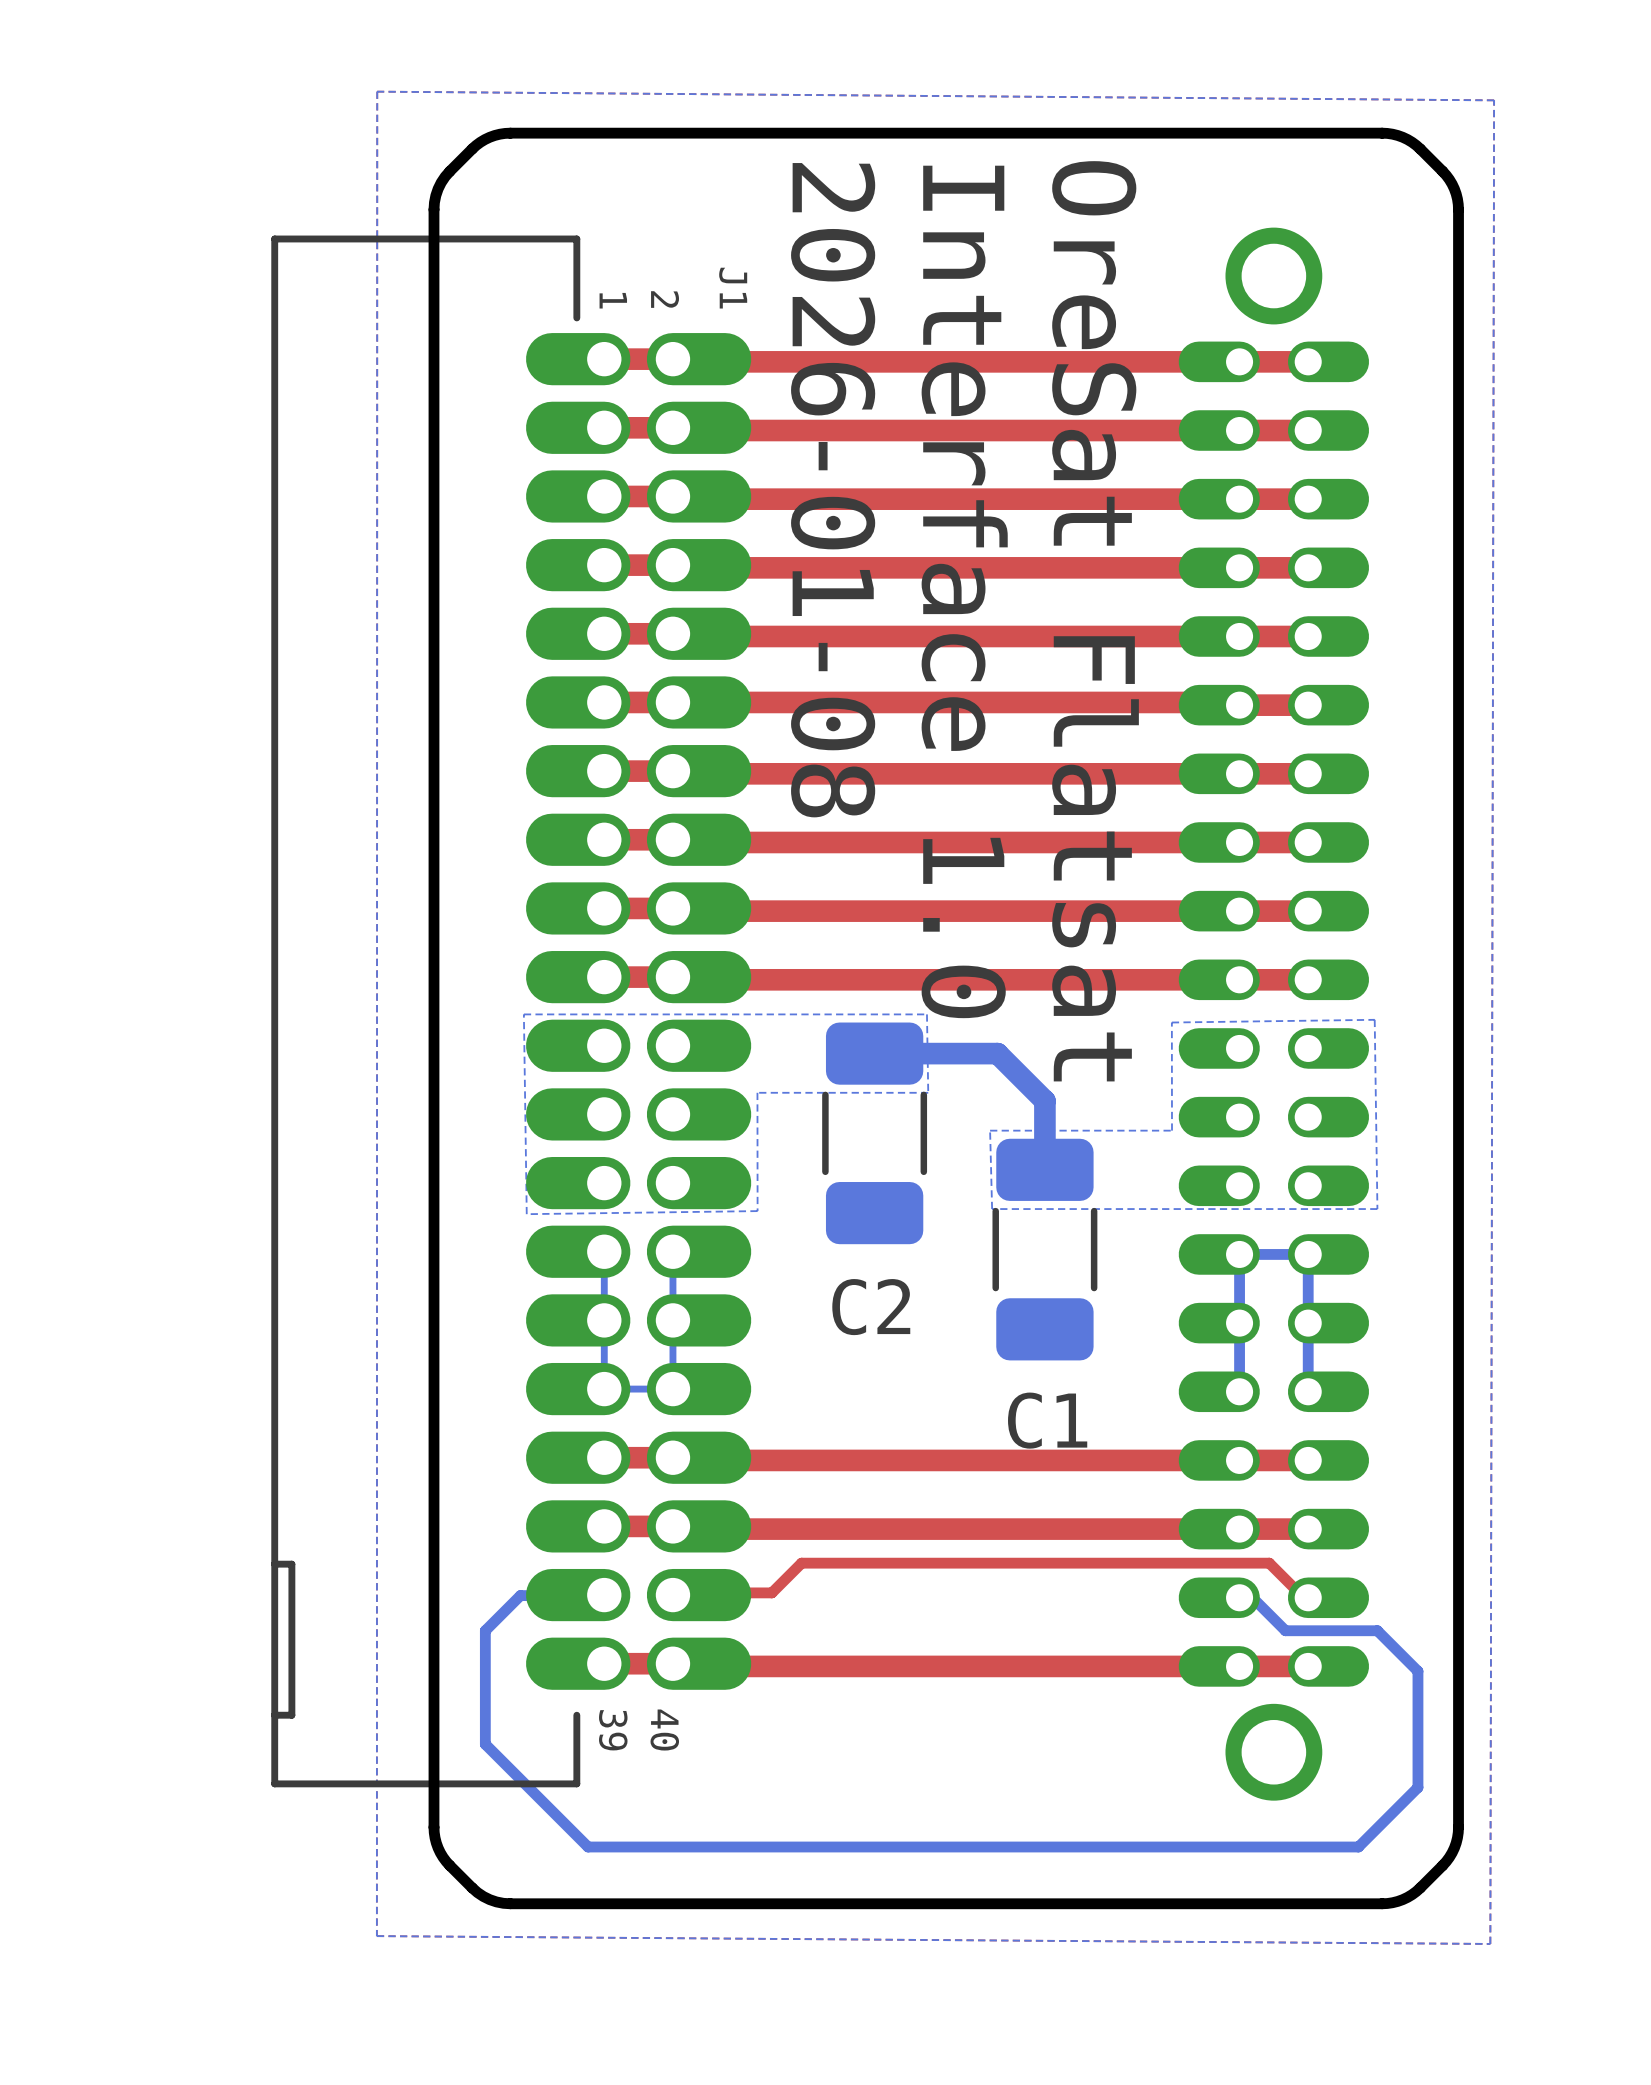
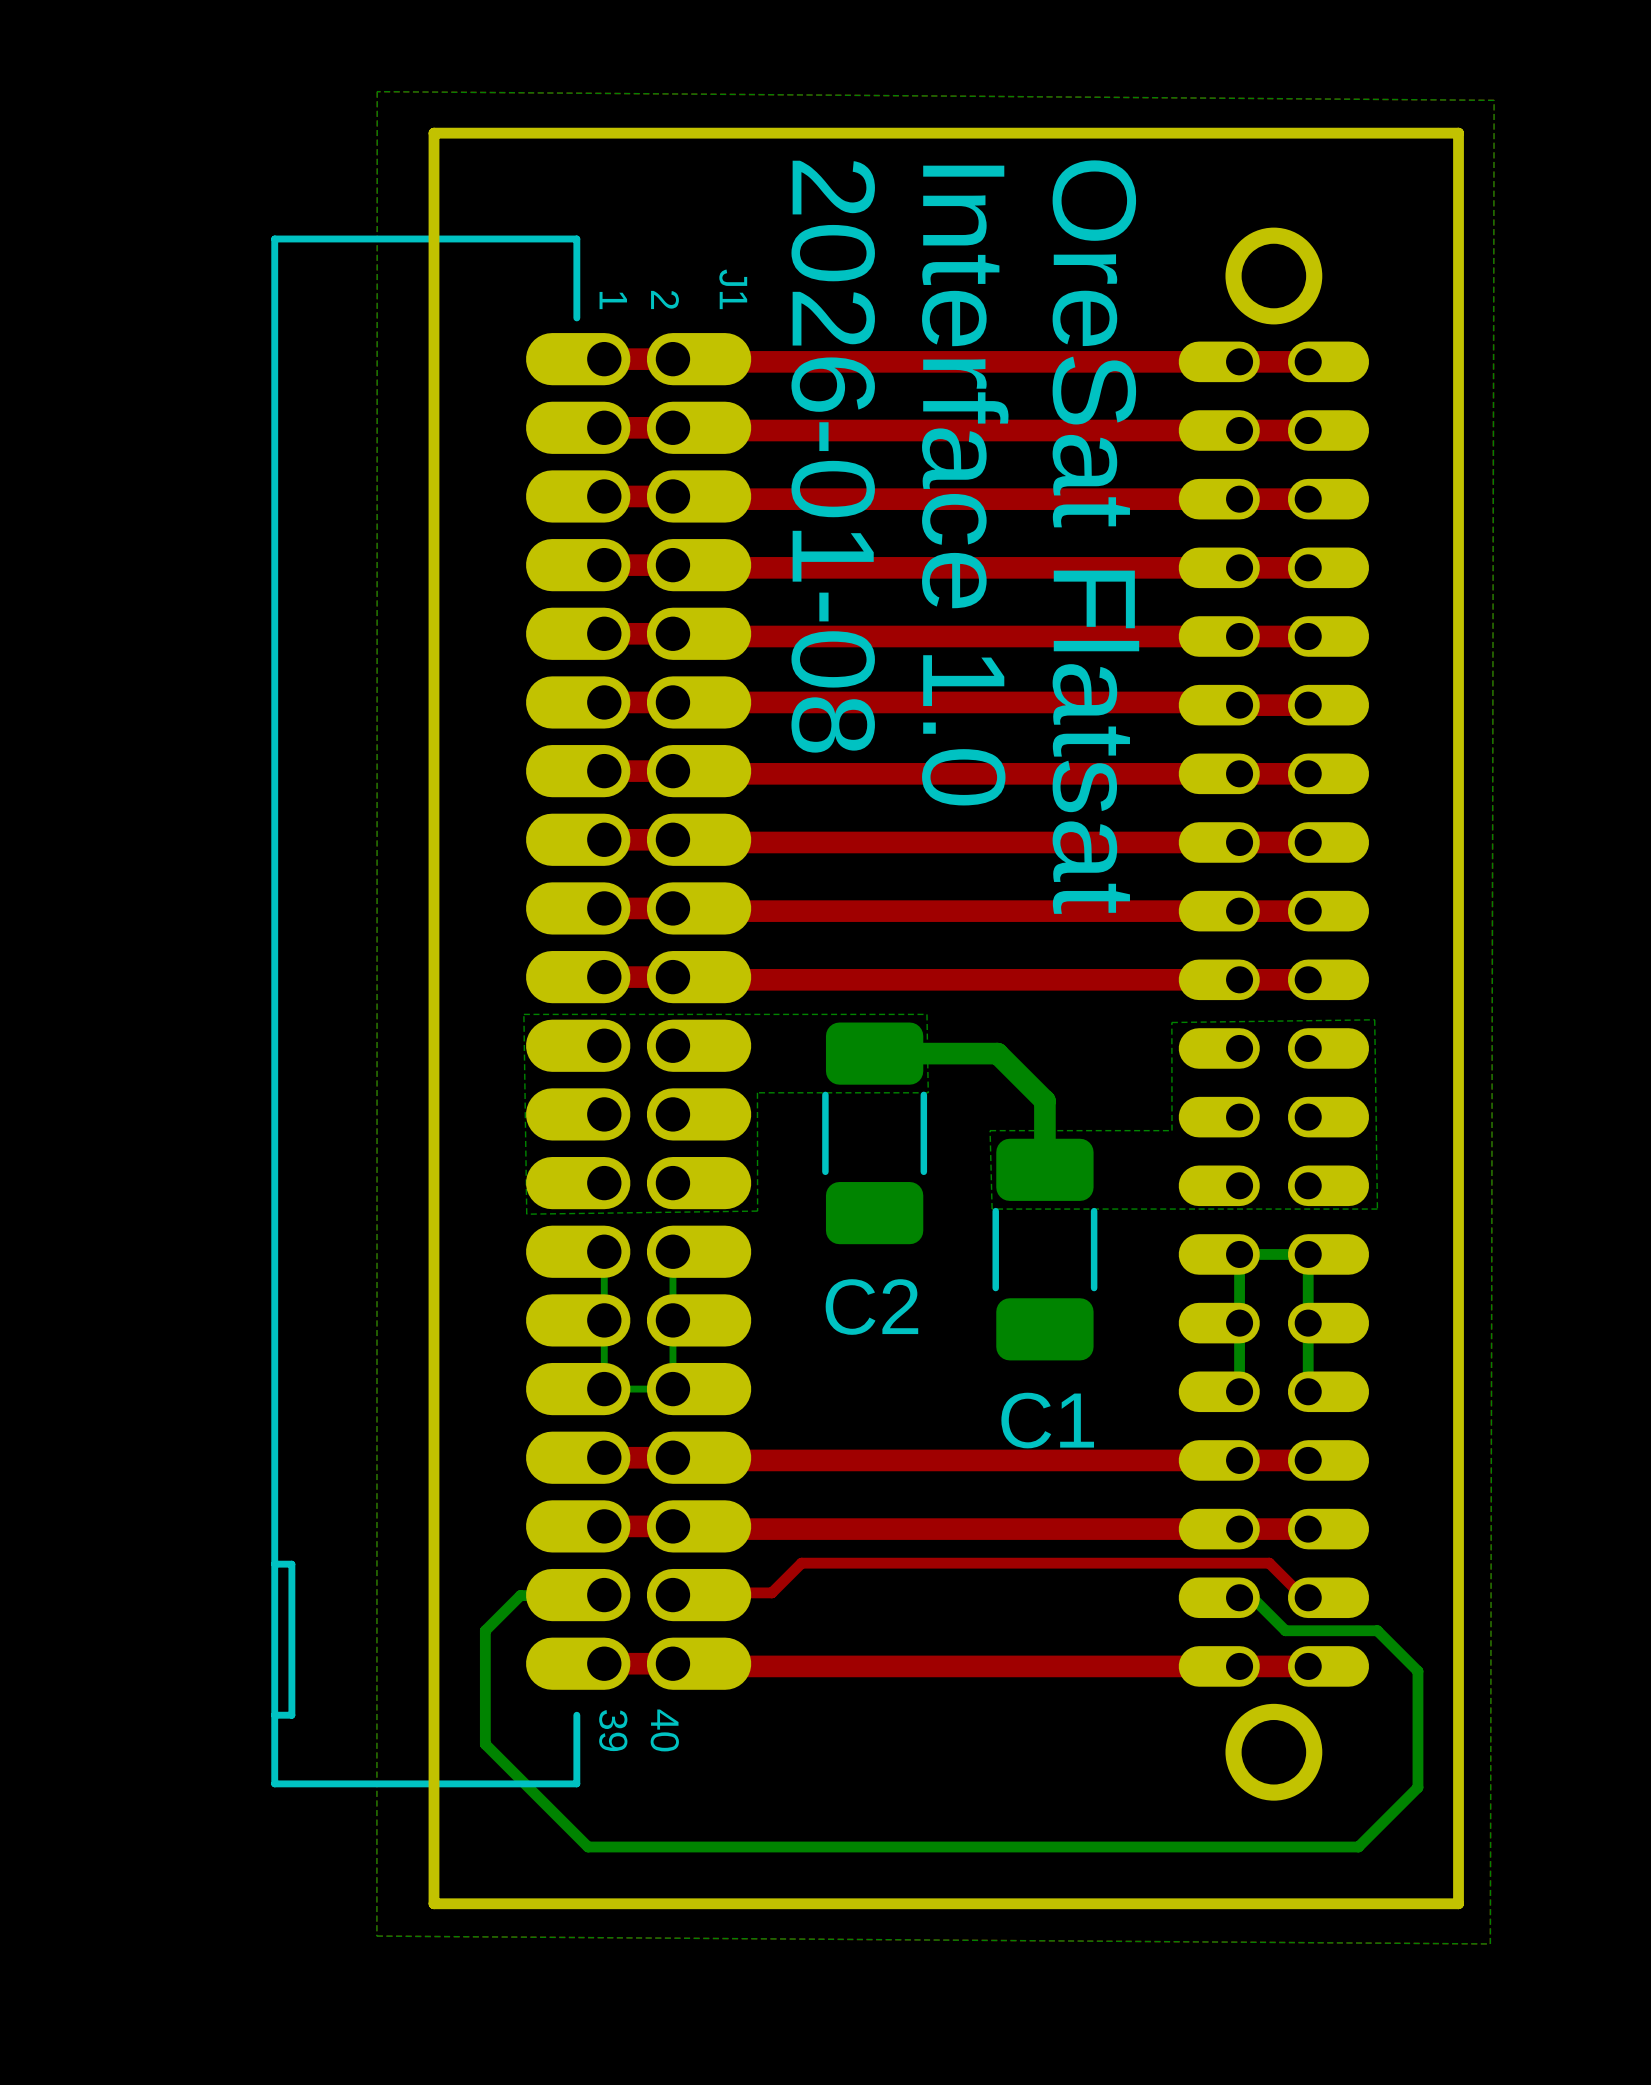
board edge: (510, 133) (489, 137) (472, 148) (441, 182) (435, 195) (433, 209) -> (510, 133) (433, 133) (433, 209)
board edge: (1382, 133) (1397, 135) (1412, 142) (1442, 171) (1454, 188) (1458, 209) -> (1382, 133) (1458, 133) (1458, 209)
board edge: (433, 1827) (436, 1843) (443, 1857) (472, 1887) (489, 1899) (510, 1903) -> (433, 1827) (433, 1903) (510, 1903)
board edge: (1458, 1827) (1454, 1848) (1442, 1865) (1412, 1894) (1397, 1901) (1382, 1903) -> (1458, 1827) (1458, 1903) (1382, 1903)

